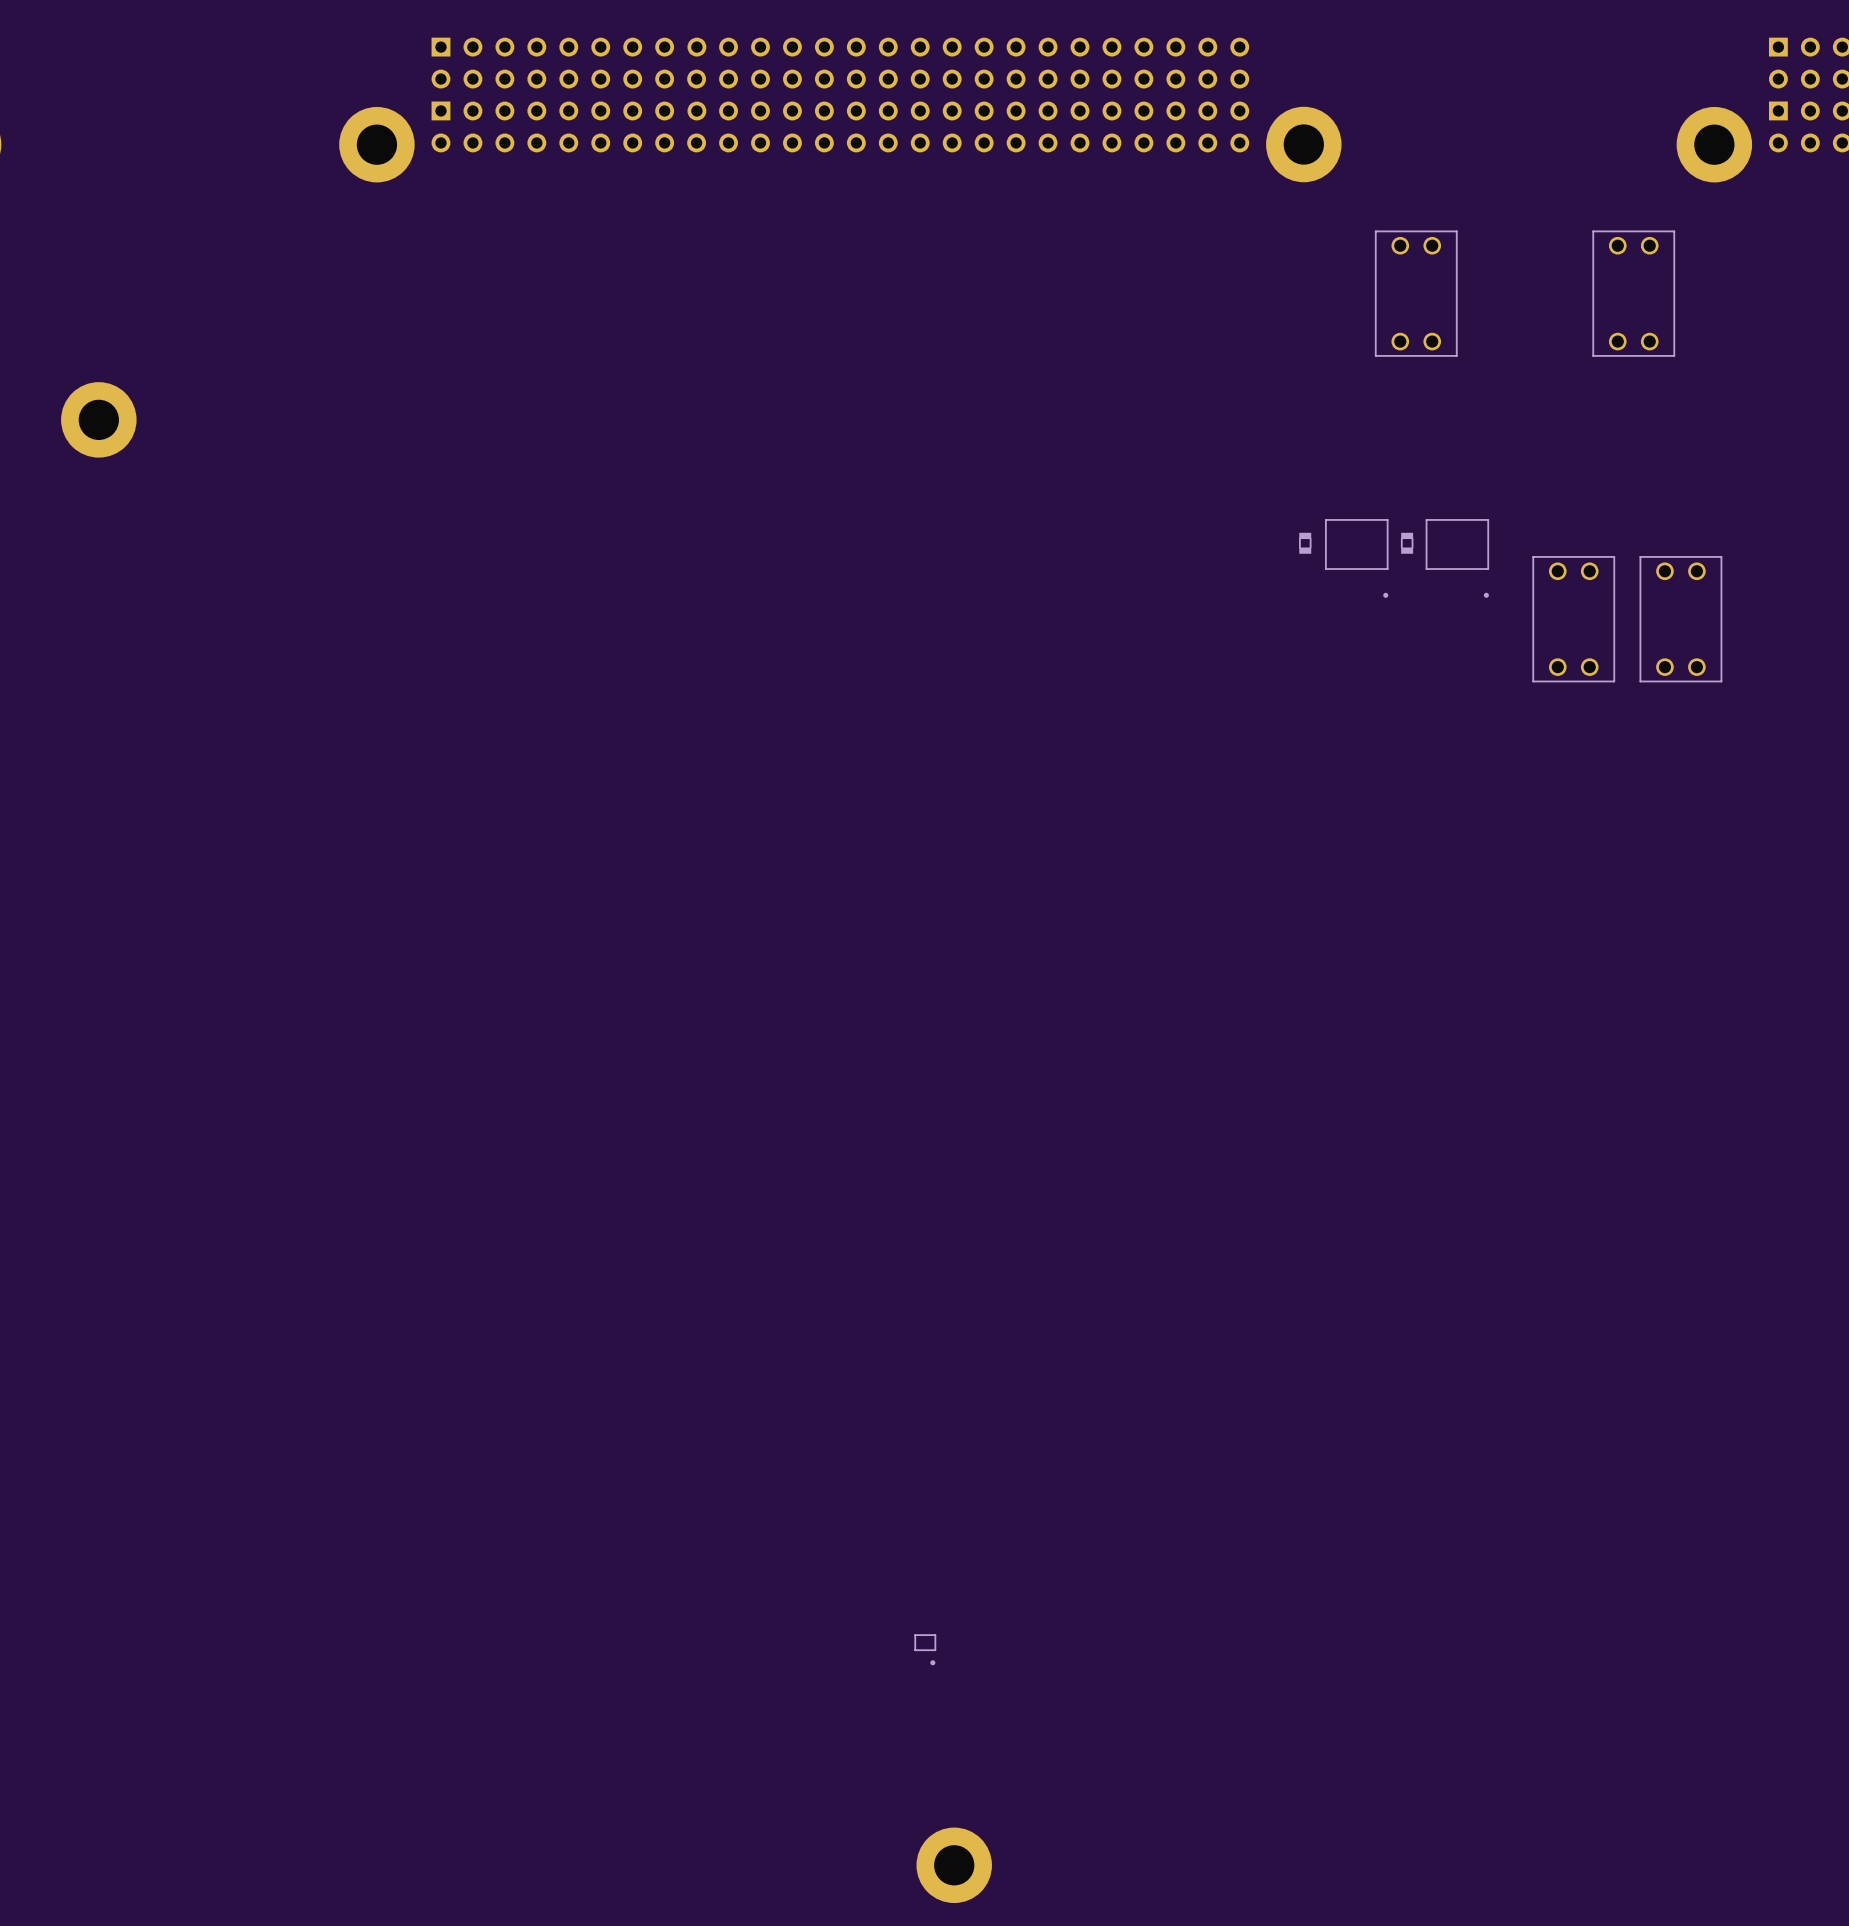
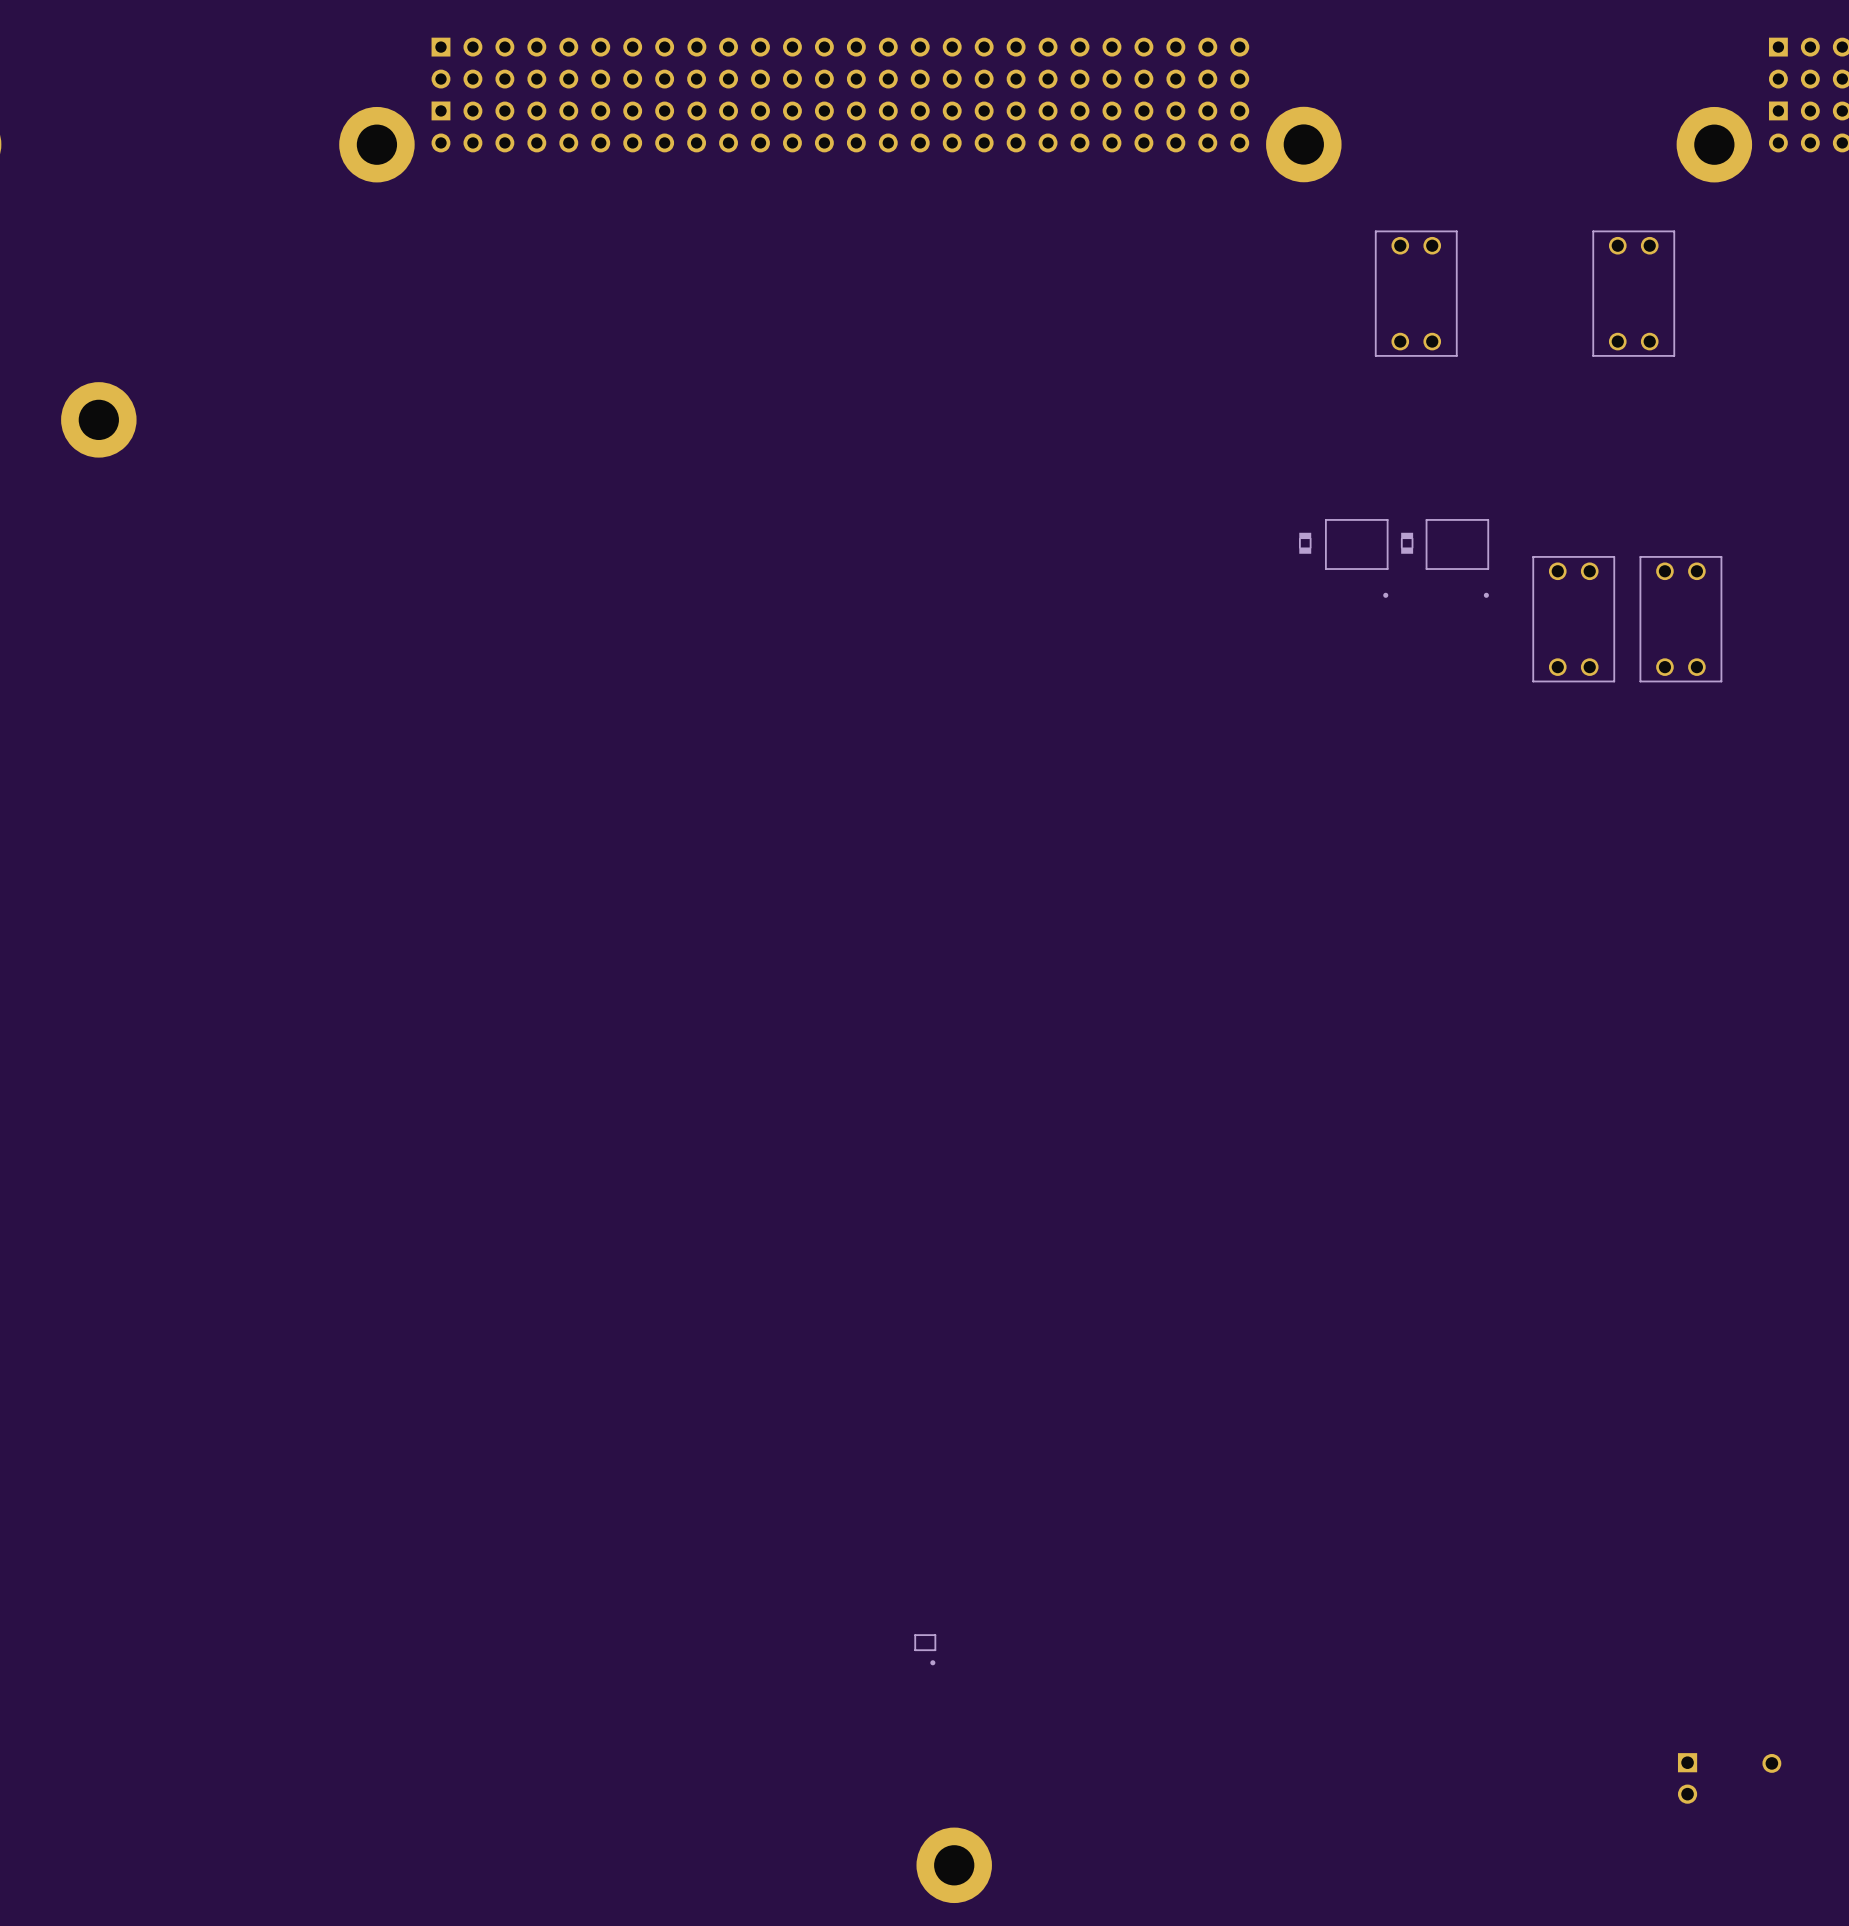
part: none -> (1771, 1763)
part: none -> (1687, 1778)

